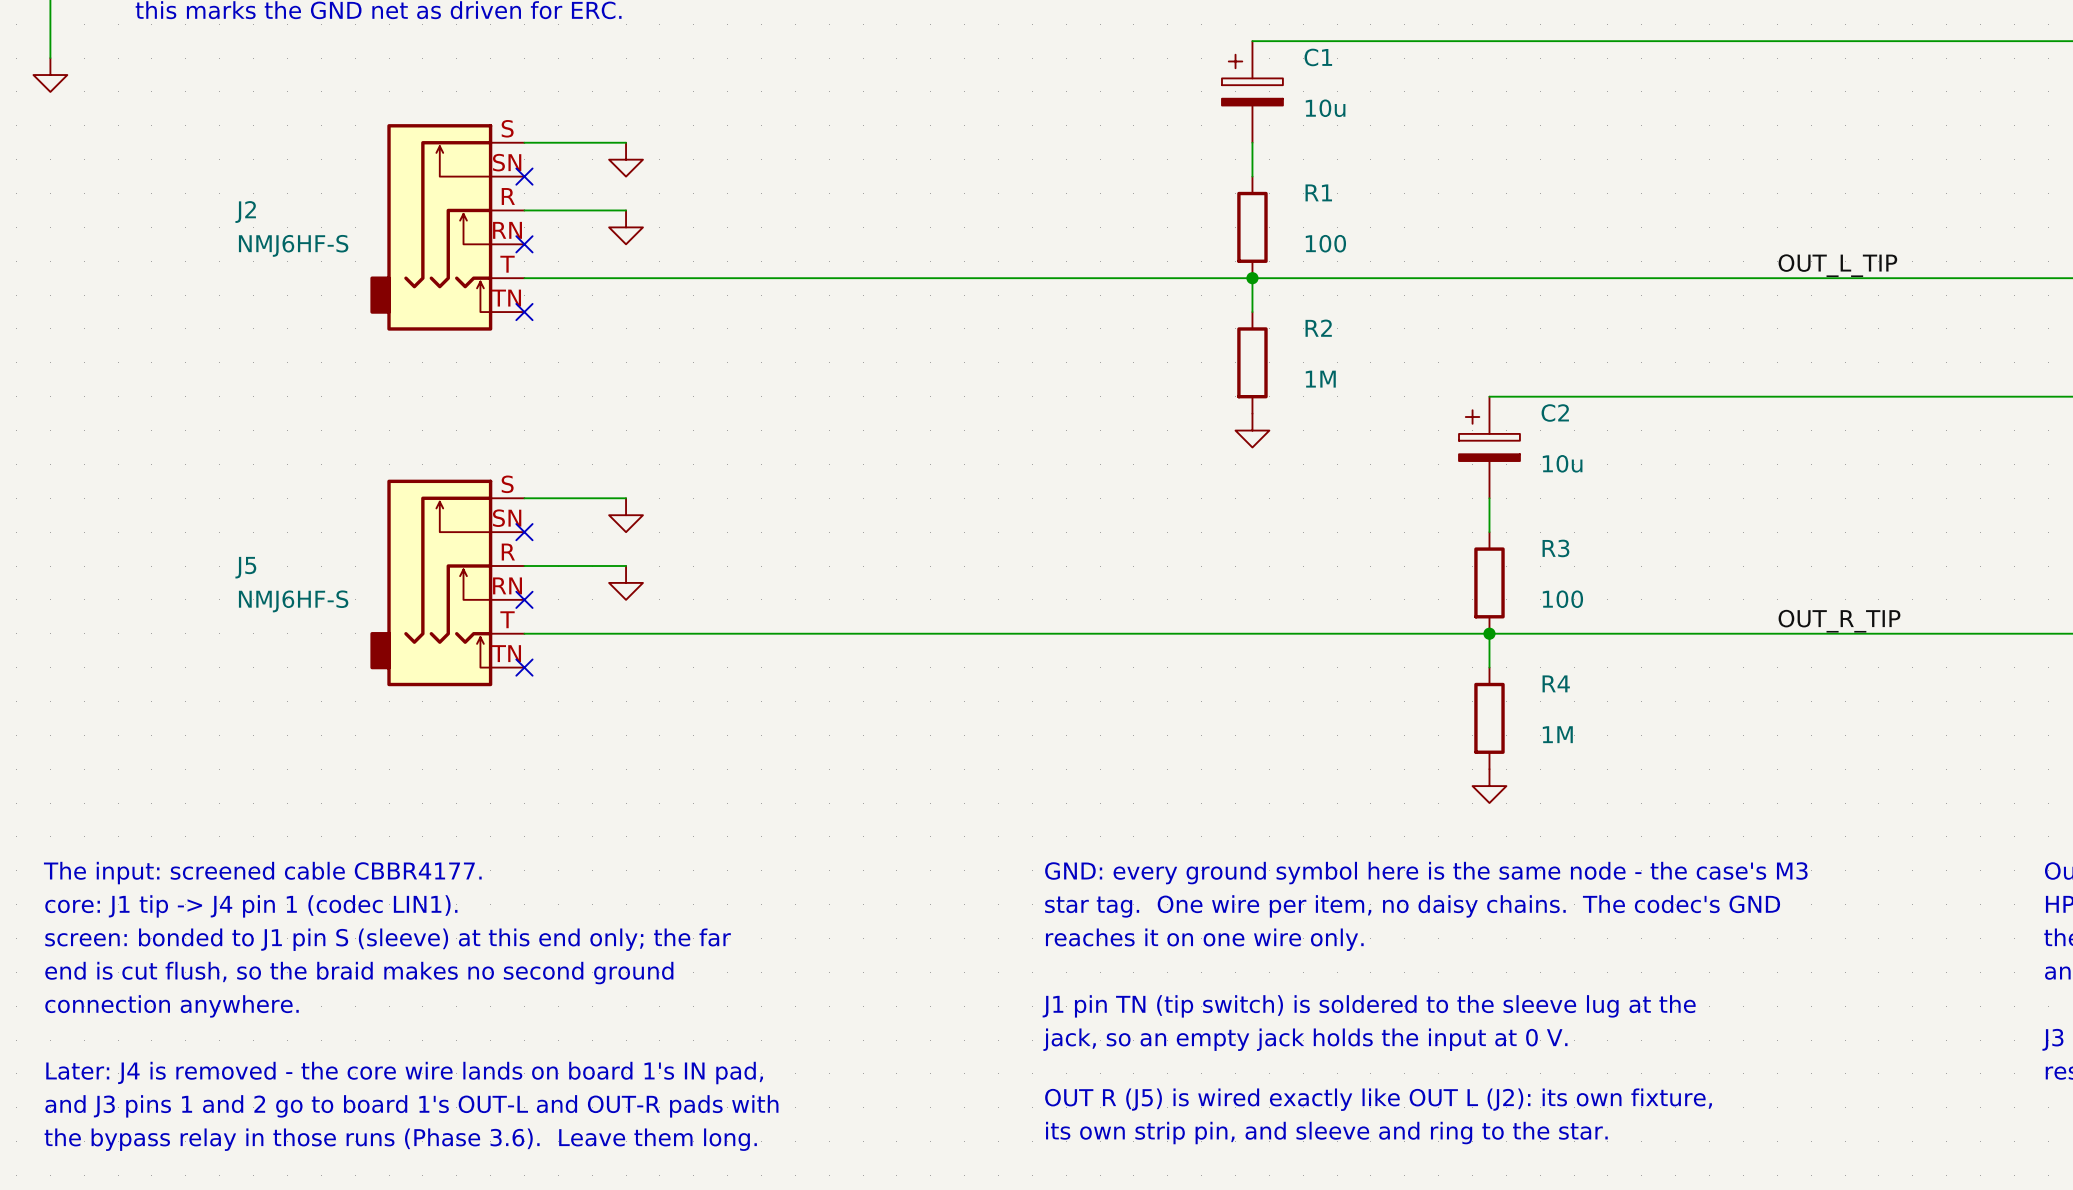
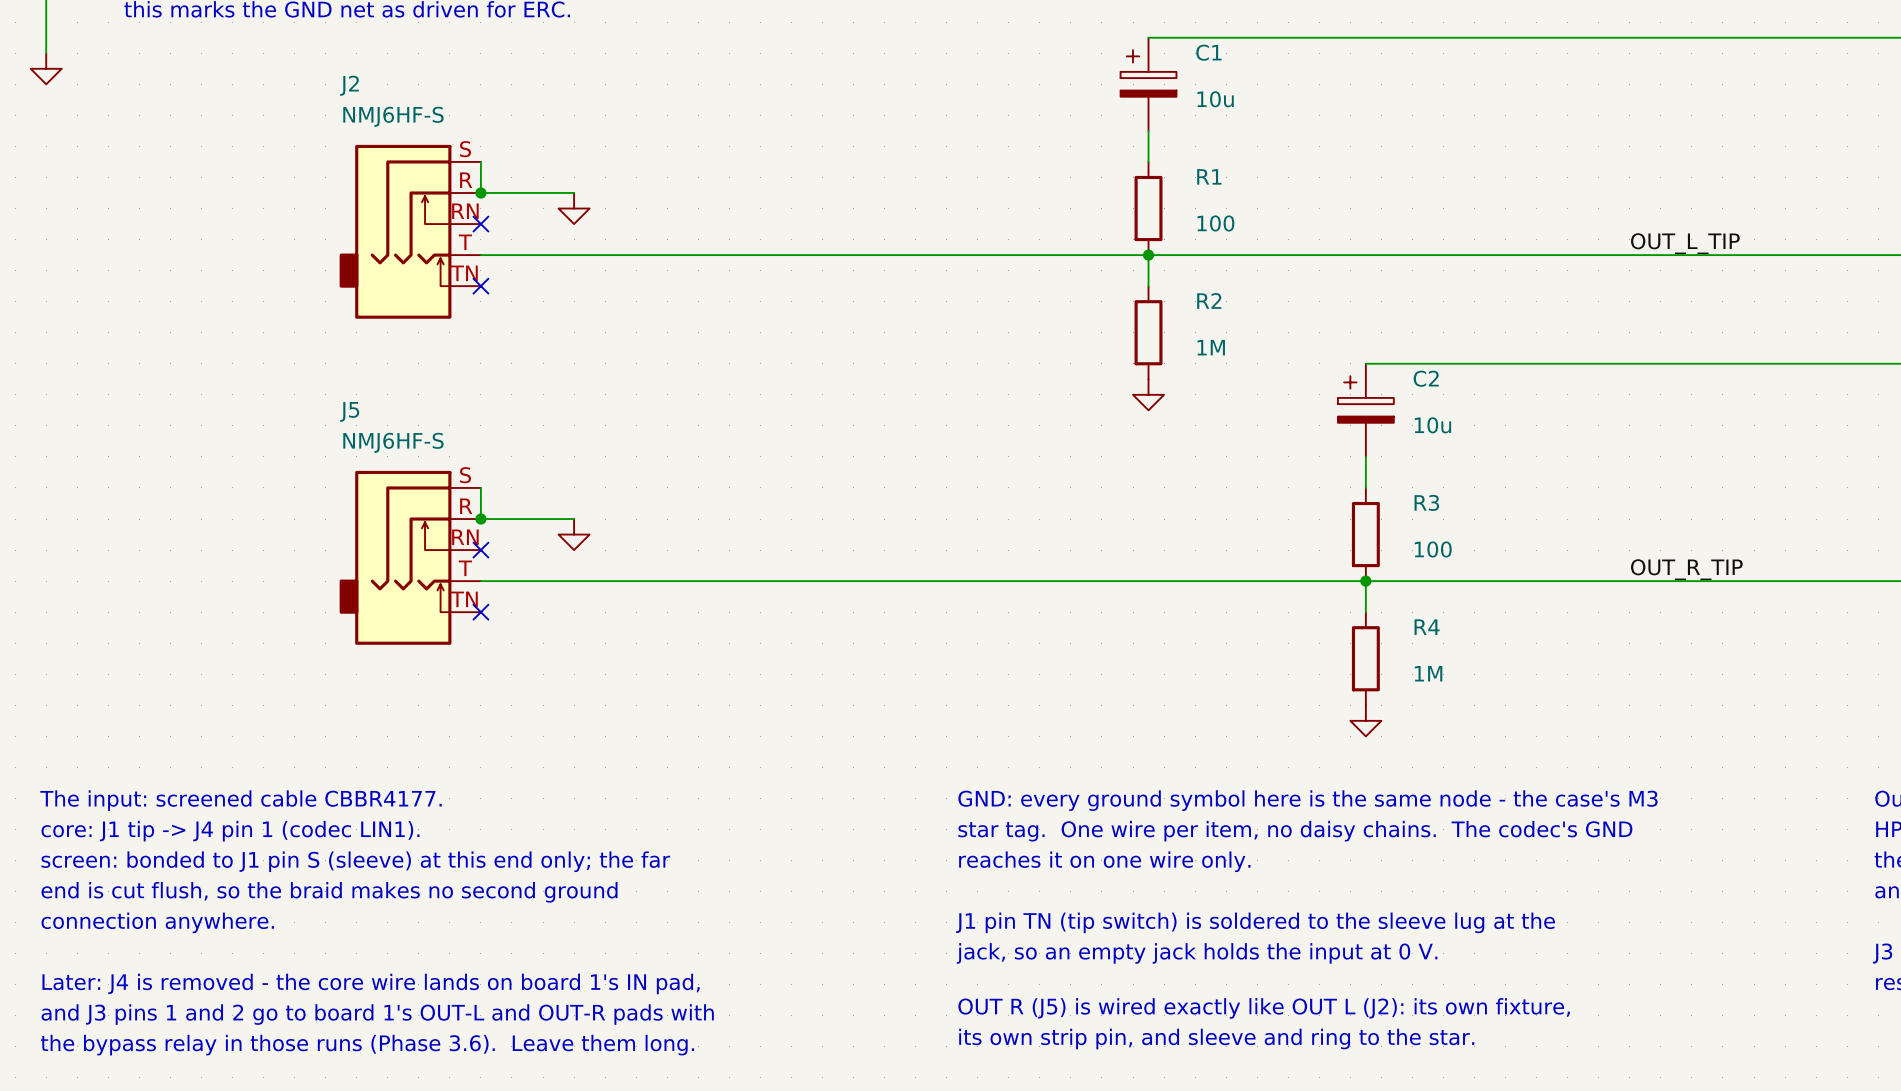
J2 symbol: [370, 124, 525, 331] -> [339, 144, 481, 319]
wire: (524, 142) (626, 142) -> none
power symbol: (626, 159) -> none
wire: none -> (480, 161) (480, 192)
no-connect mark: (524, 176) -> none
junction: none -> (480, 192)
J2 name position: J2 (245, 212) -> J2 (349, 85)
J2 value position: NMJ6HF-S (293, 245) -> NMJ6HF-S (393, 116)
J5 symbol: [370, 479, 525, 687] -> [339, 470, 481, 645]
wire: (524, 498) (626, 498) -> none
power symbol: (626, 515) -> none
wire: none -> (480, 487) (480, 519)
no-connect mark: (524, 532) -> none
junction: none -> (480, 519)
J5 name position: J5 (245, 567) -> J5 (349, 411)
J5 value position: NMJ6HF-S (293, 601) -> NMJ6HF-S (393, 442)

